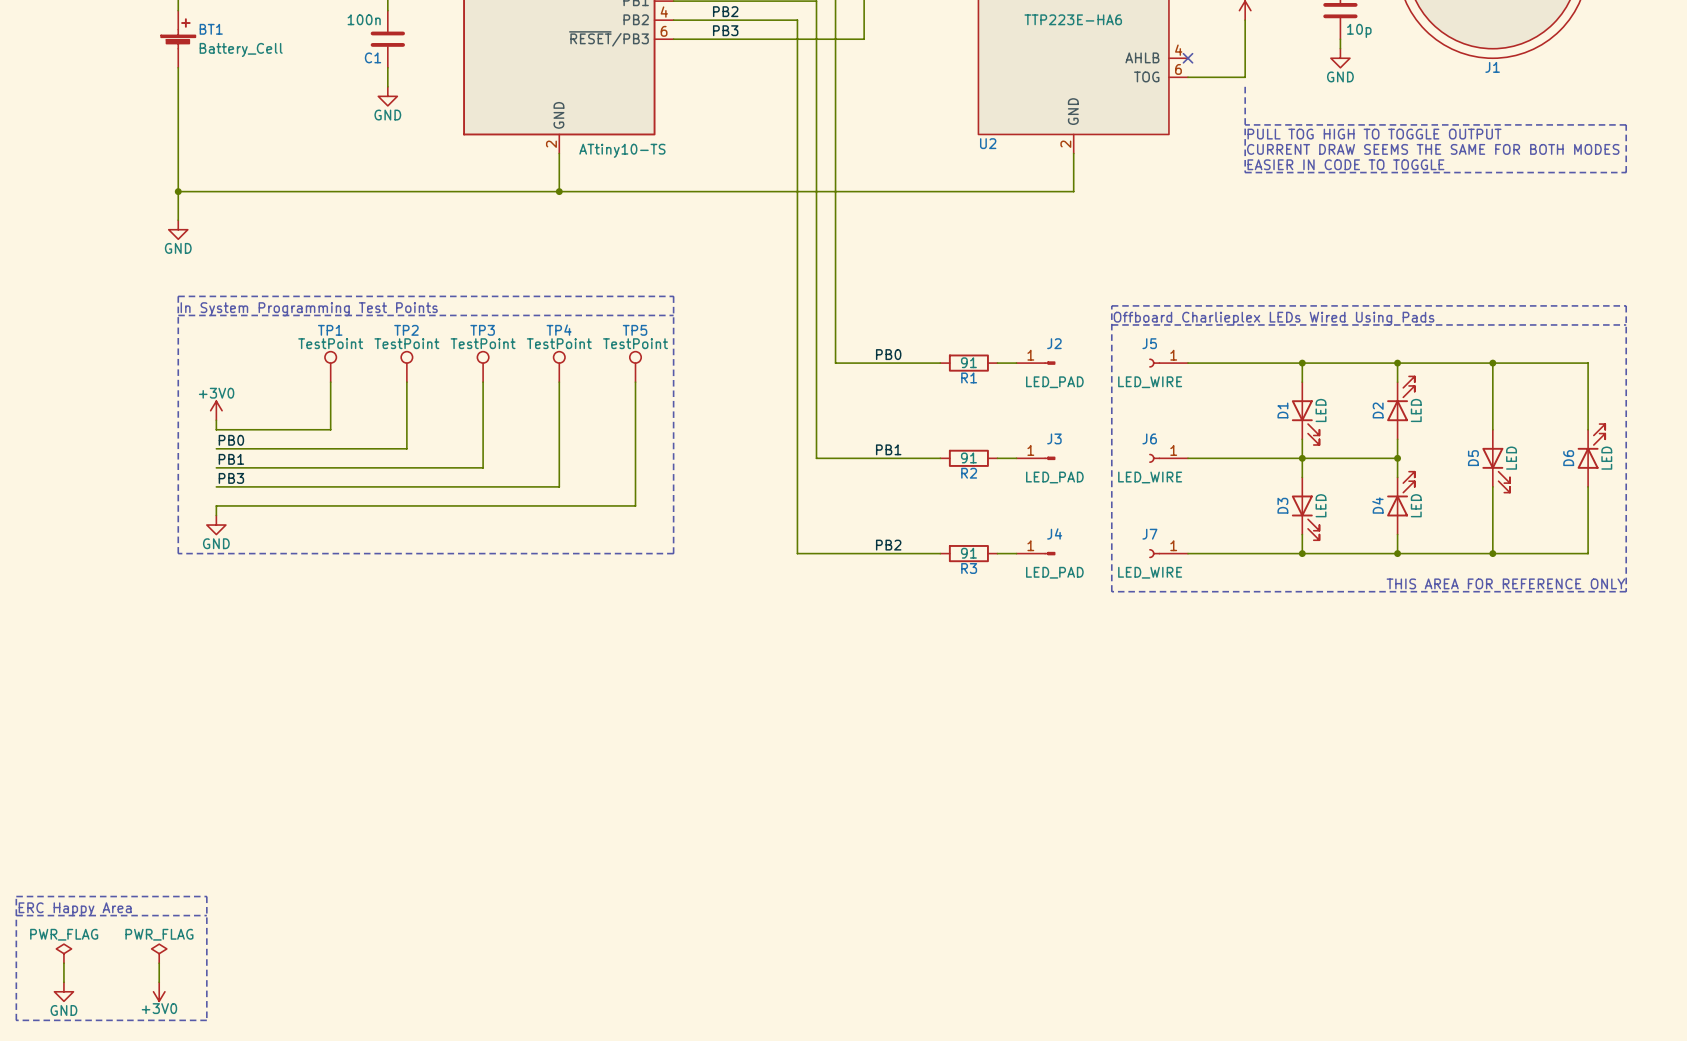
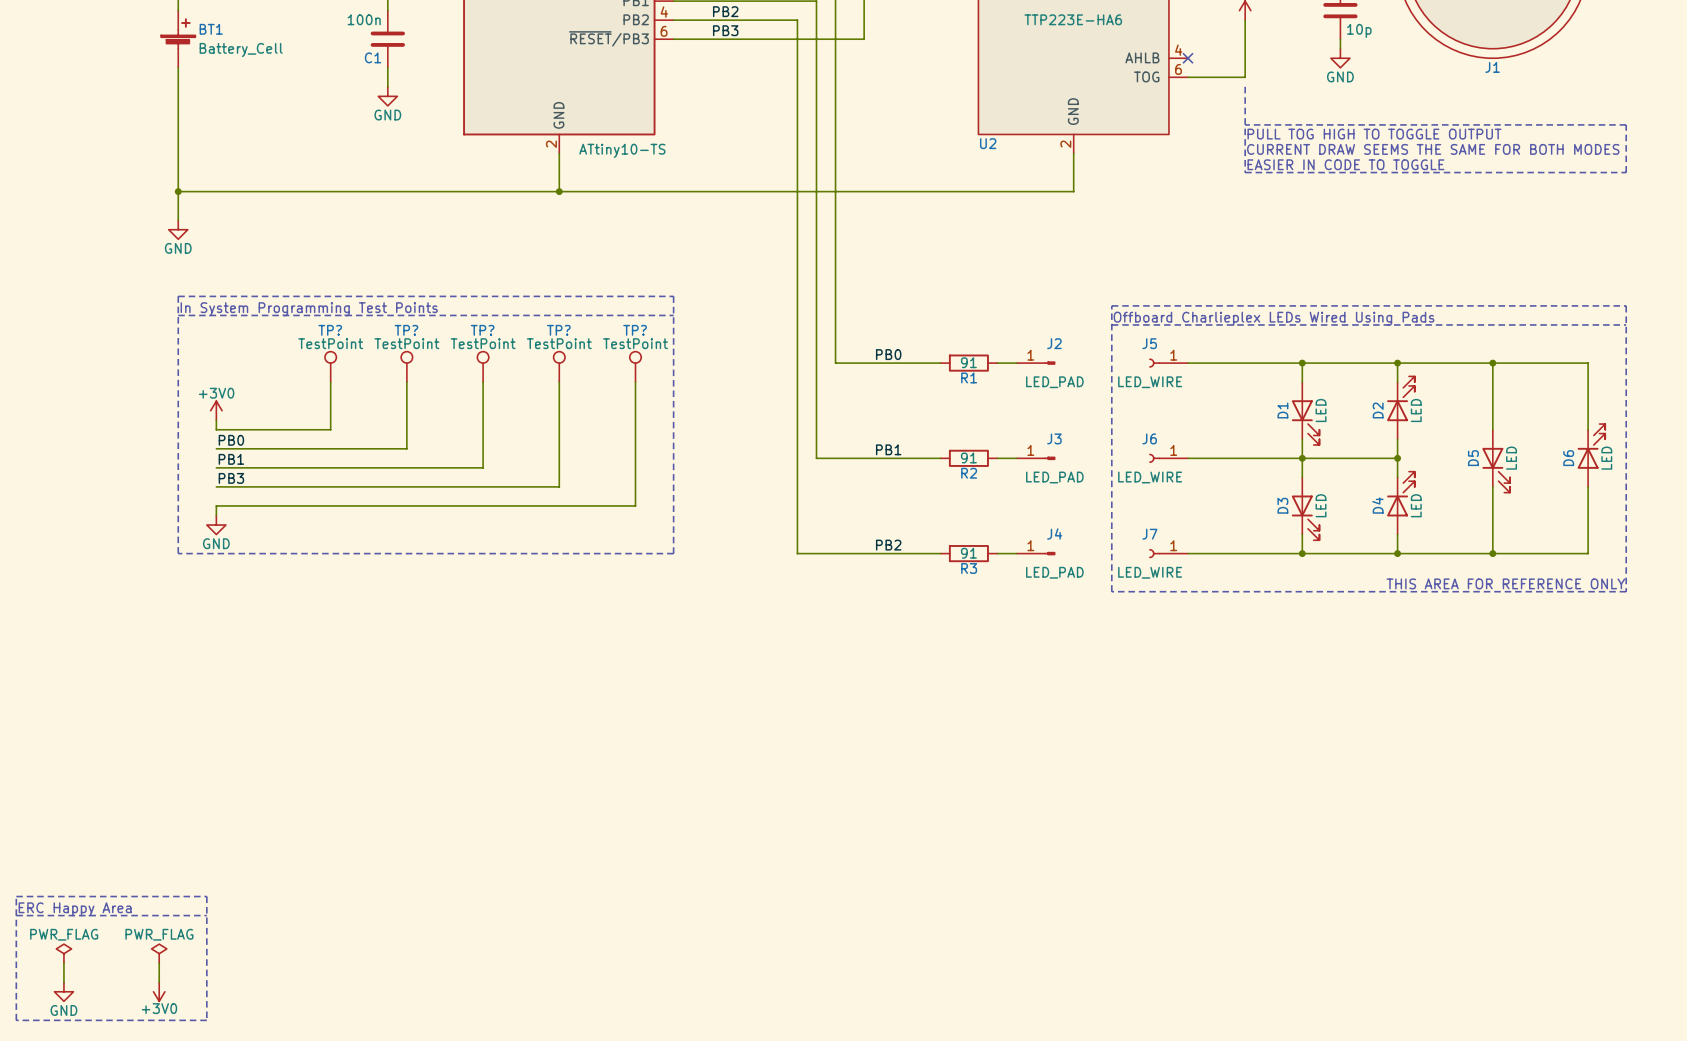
TP1 name: TP1 (330, 330) -> TP? (330, 330)
TP2 name: TP2 (406, 330) -> TP? (406, 330)
TP3 name: TP3 (482, 330) -> TP? (482, 330)
TP4 name: TP4 (559, 330) -> TP? (558, 330)
TP5 name: TP5 (635, 330) -> TP? (635, 330)

